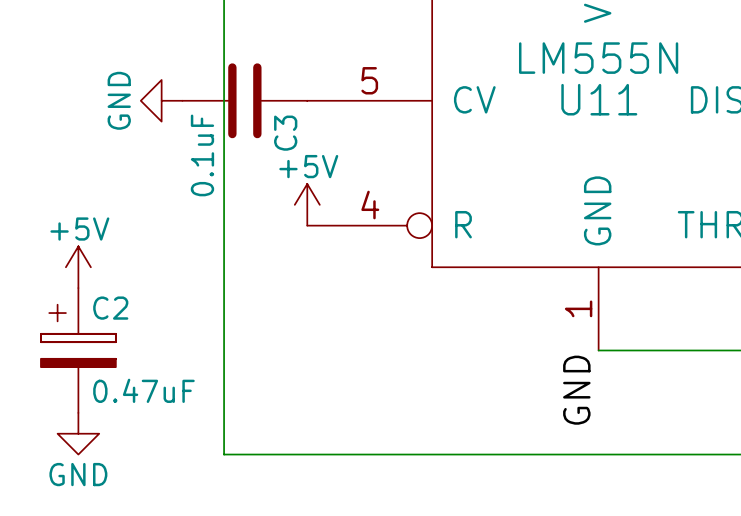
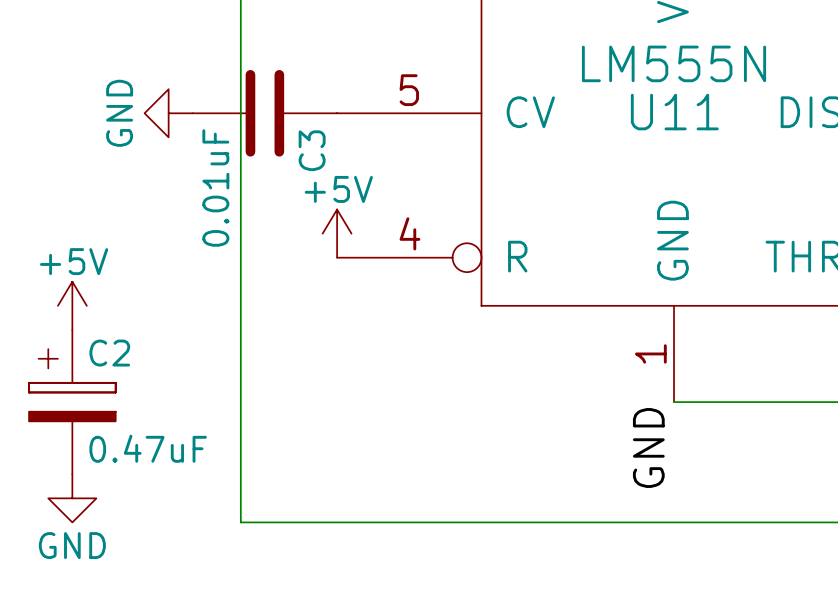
C3 value: 0.1uF (202, 155) -> 0.01uF (215, 187)

